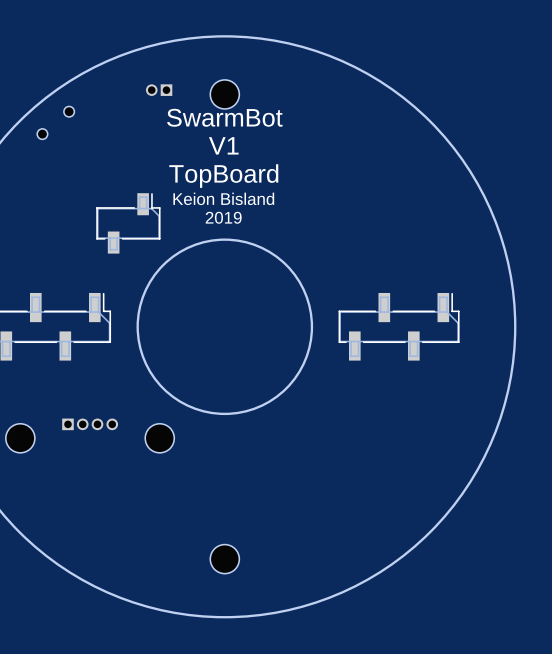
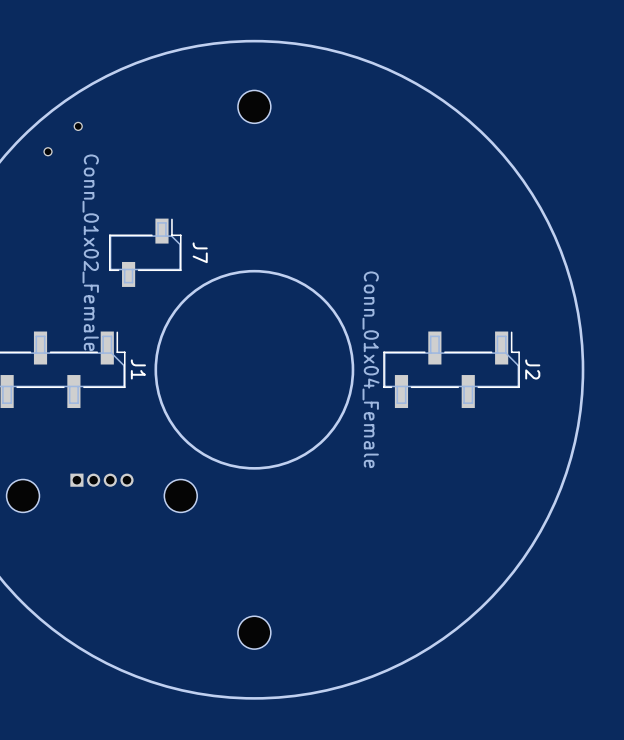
part: (159, 90) -> none
part footprint: [37, 106, 75, 140] -> [43, 121, 83, 157]
text: SwarmBot (224, 117) -> none
text: V1 (223, 145) -> none
text: TopBoard (223, 176) -> none
text: Keion Bisland (223, 198) -> none
text: 2019 (223, 217) -> none
J7 value: none -> Conn_01x02_Female (90, 252)
J7 name: none -> J7 (200, 252)
J1 name: none -> J1 (138, 369)
J2 value: none -> Conn_01x04_Female (371, 369)
J2 name: none -> J2 (532, 369)

